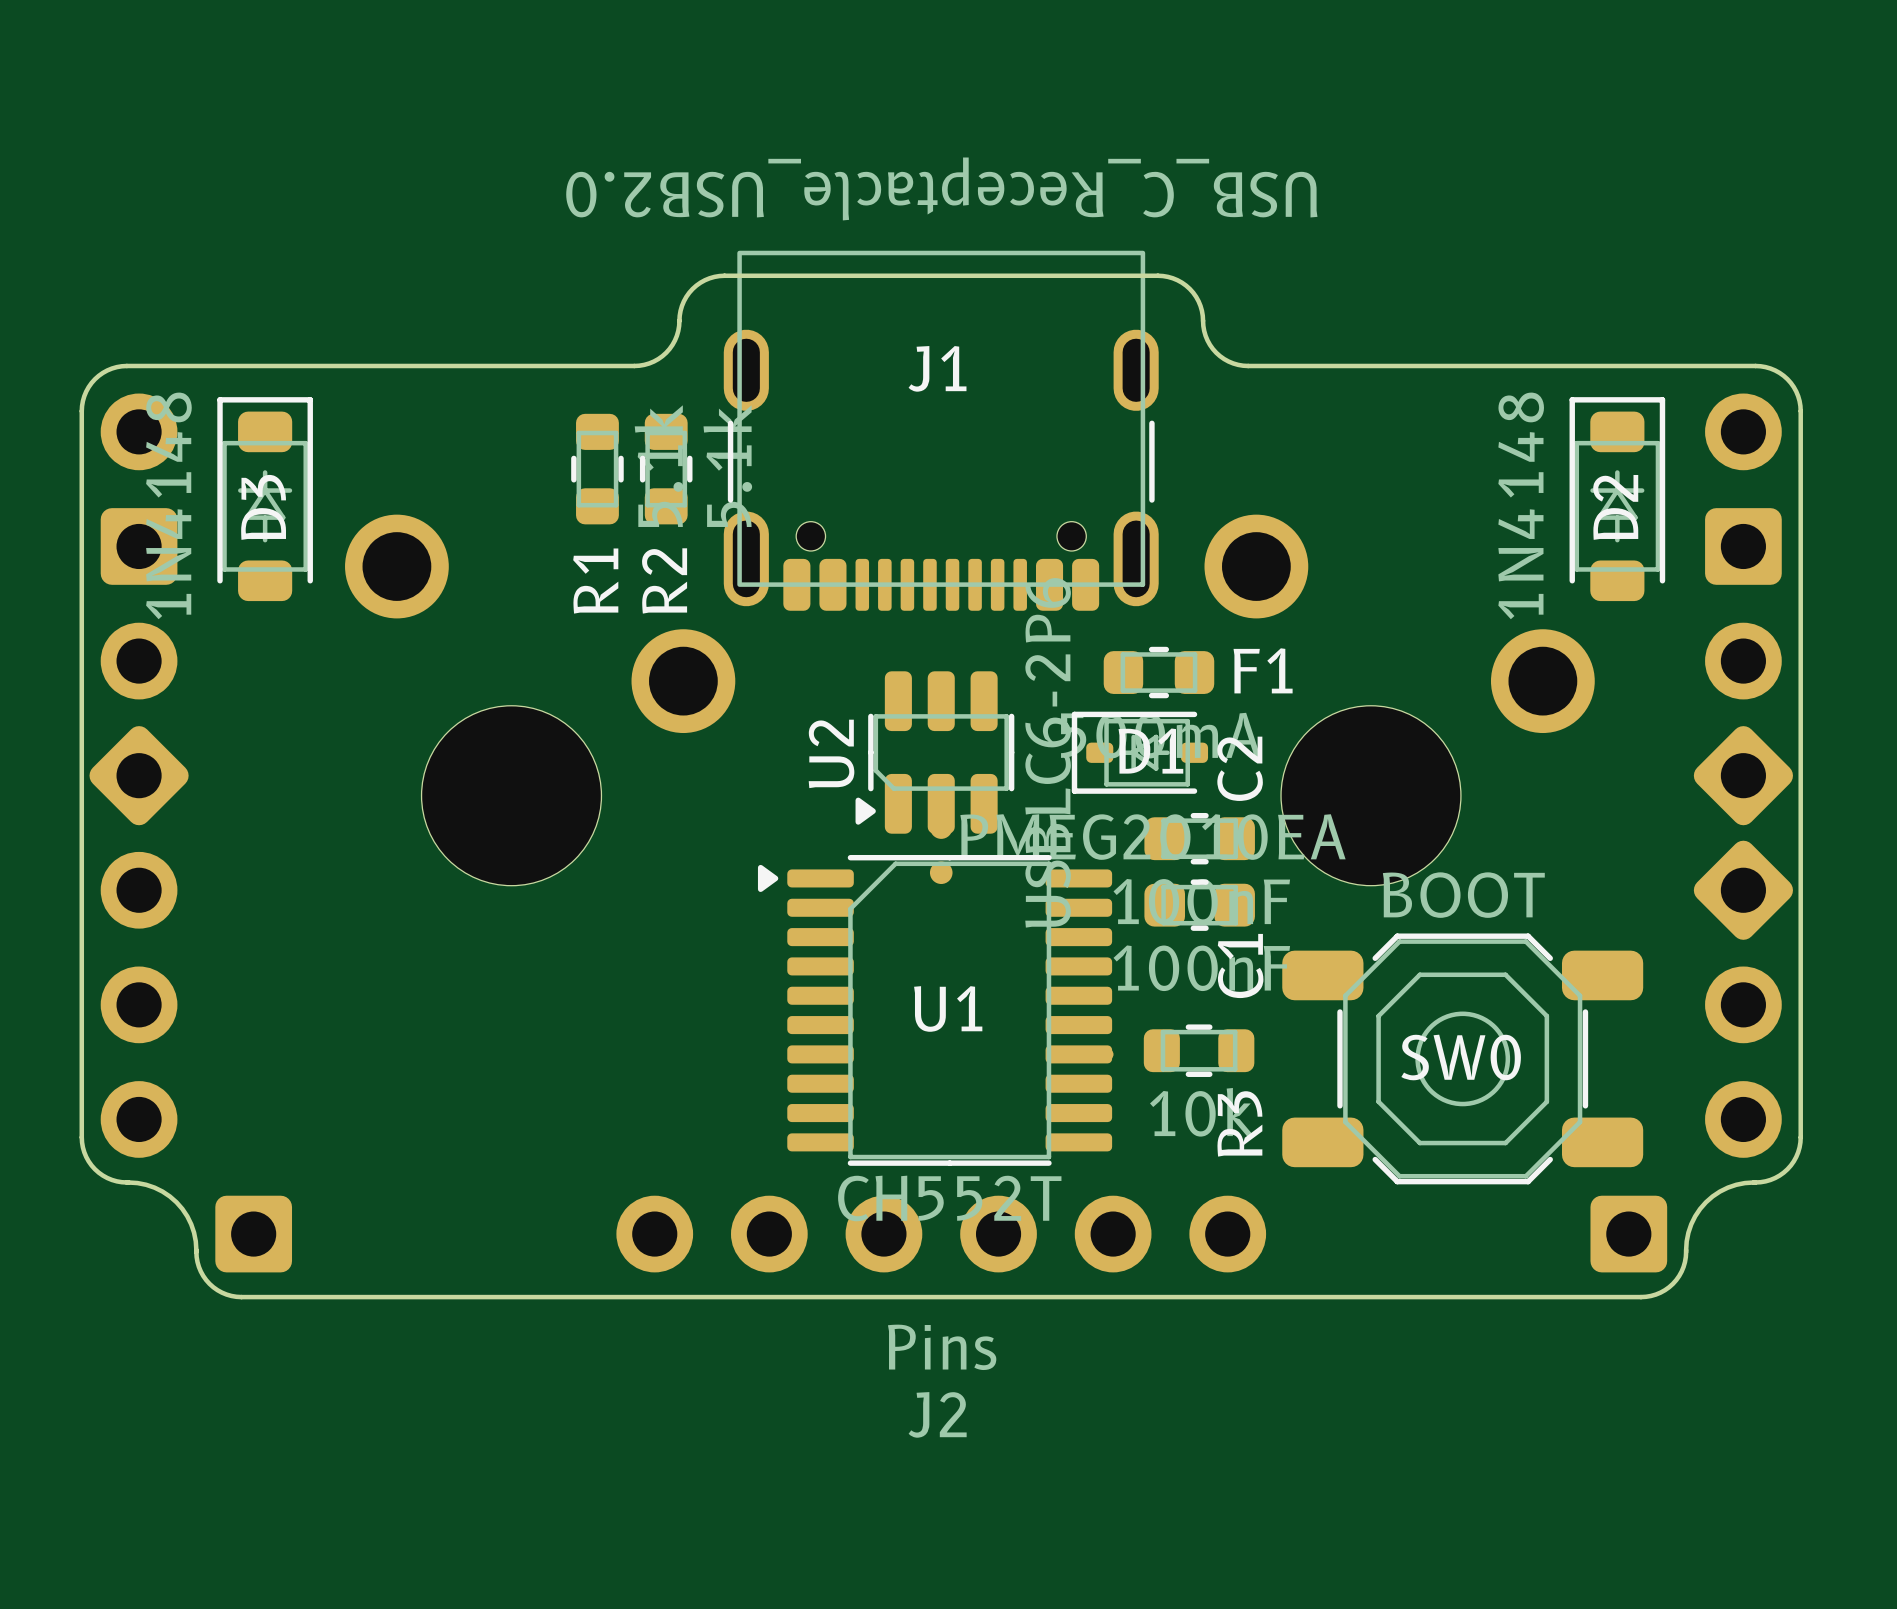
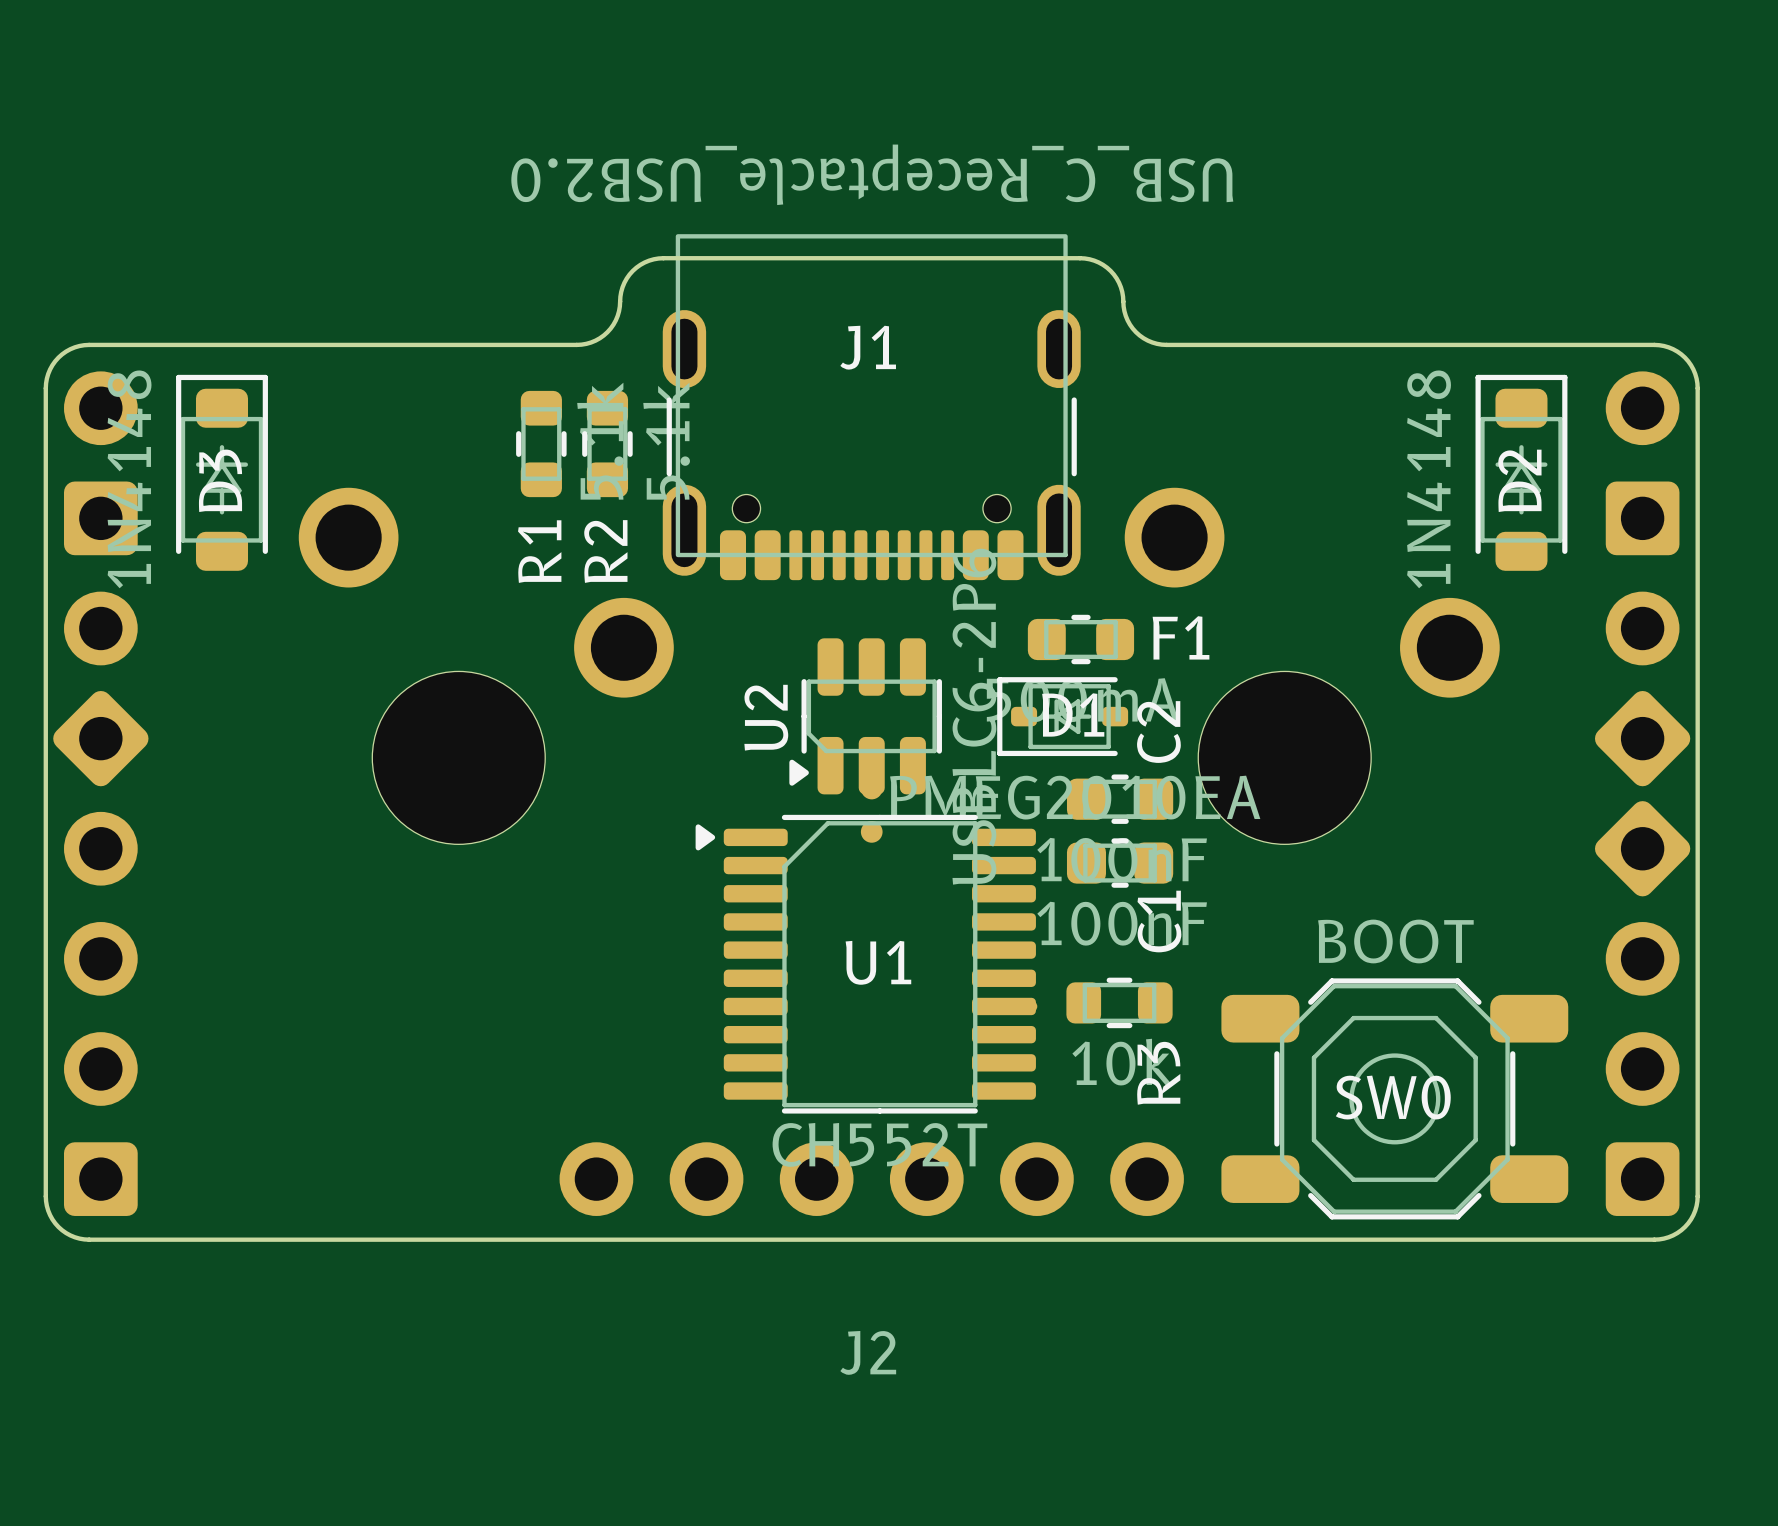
J2 footprint: [89, 393, 1793, 1273] -> [53, 371, 1691, 1216]
SW0 position: (1462, 1058) -> (1394, 1098)
board edge: (81, 1137) (84, 1152) (88, 1161) (102, 1175) (116, 1181) (137, 1183) (154, 1187) (176, 1202) (191, 1224) (195, 1241) (197, 1262) (203, 1275) (213, 1287) (221, 1292) (241, 1297) -> (45, 1086) (46, 1201) (50, 1215) (58, 1226) (70, 1235) (84, 1239) (199, 1239)
board edge: (1800, 1137) (1796, 1156) (1787, 1169) (1779, 1175) (1765, 1181) (1744, 1183) (1727, 1187) (1705, 1202) (1691, 1224) (1686, 1241) (1684, 1262) (1679, 1275) (1669, 1287) (1660, 1292) (1641, 1297) -> (1697, 1086) (1697, 1201) (1693, 1215) (1684, 1226) (1673, 1235) (1659, 1239) (1544, 1239)
J2 value: Pins (942, 1347) -> none

